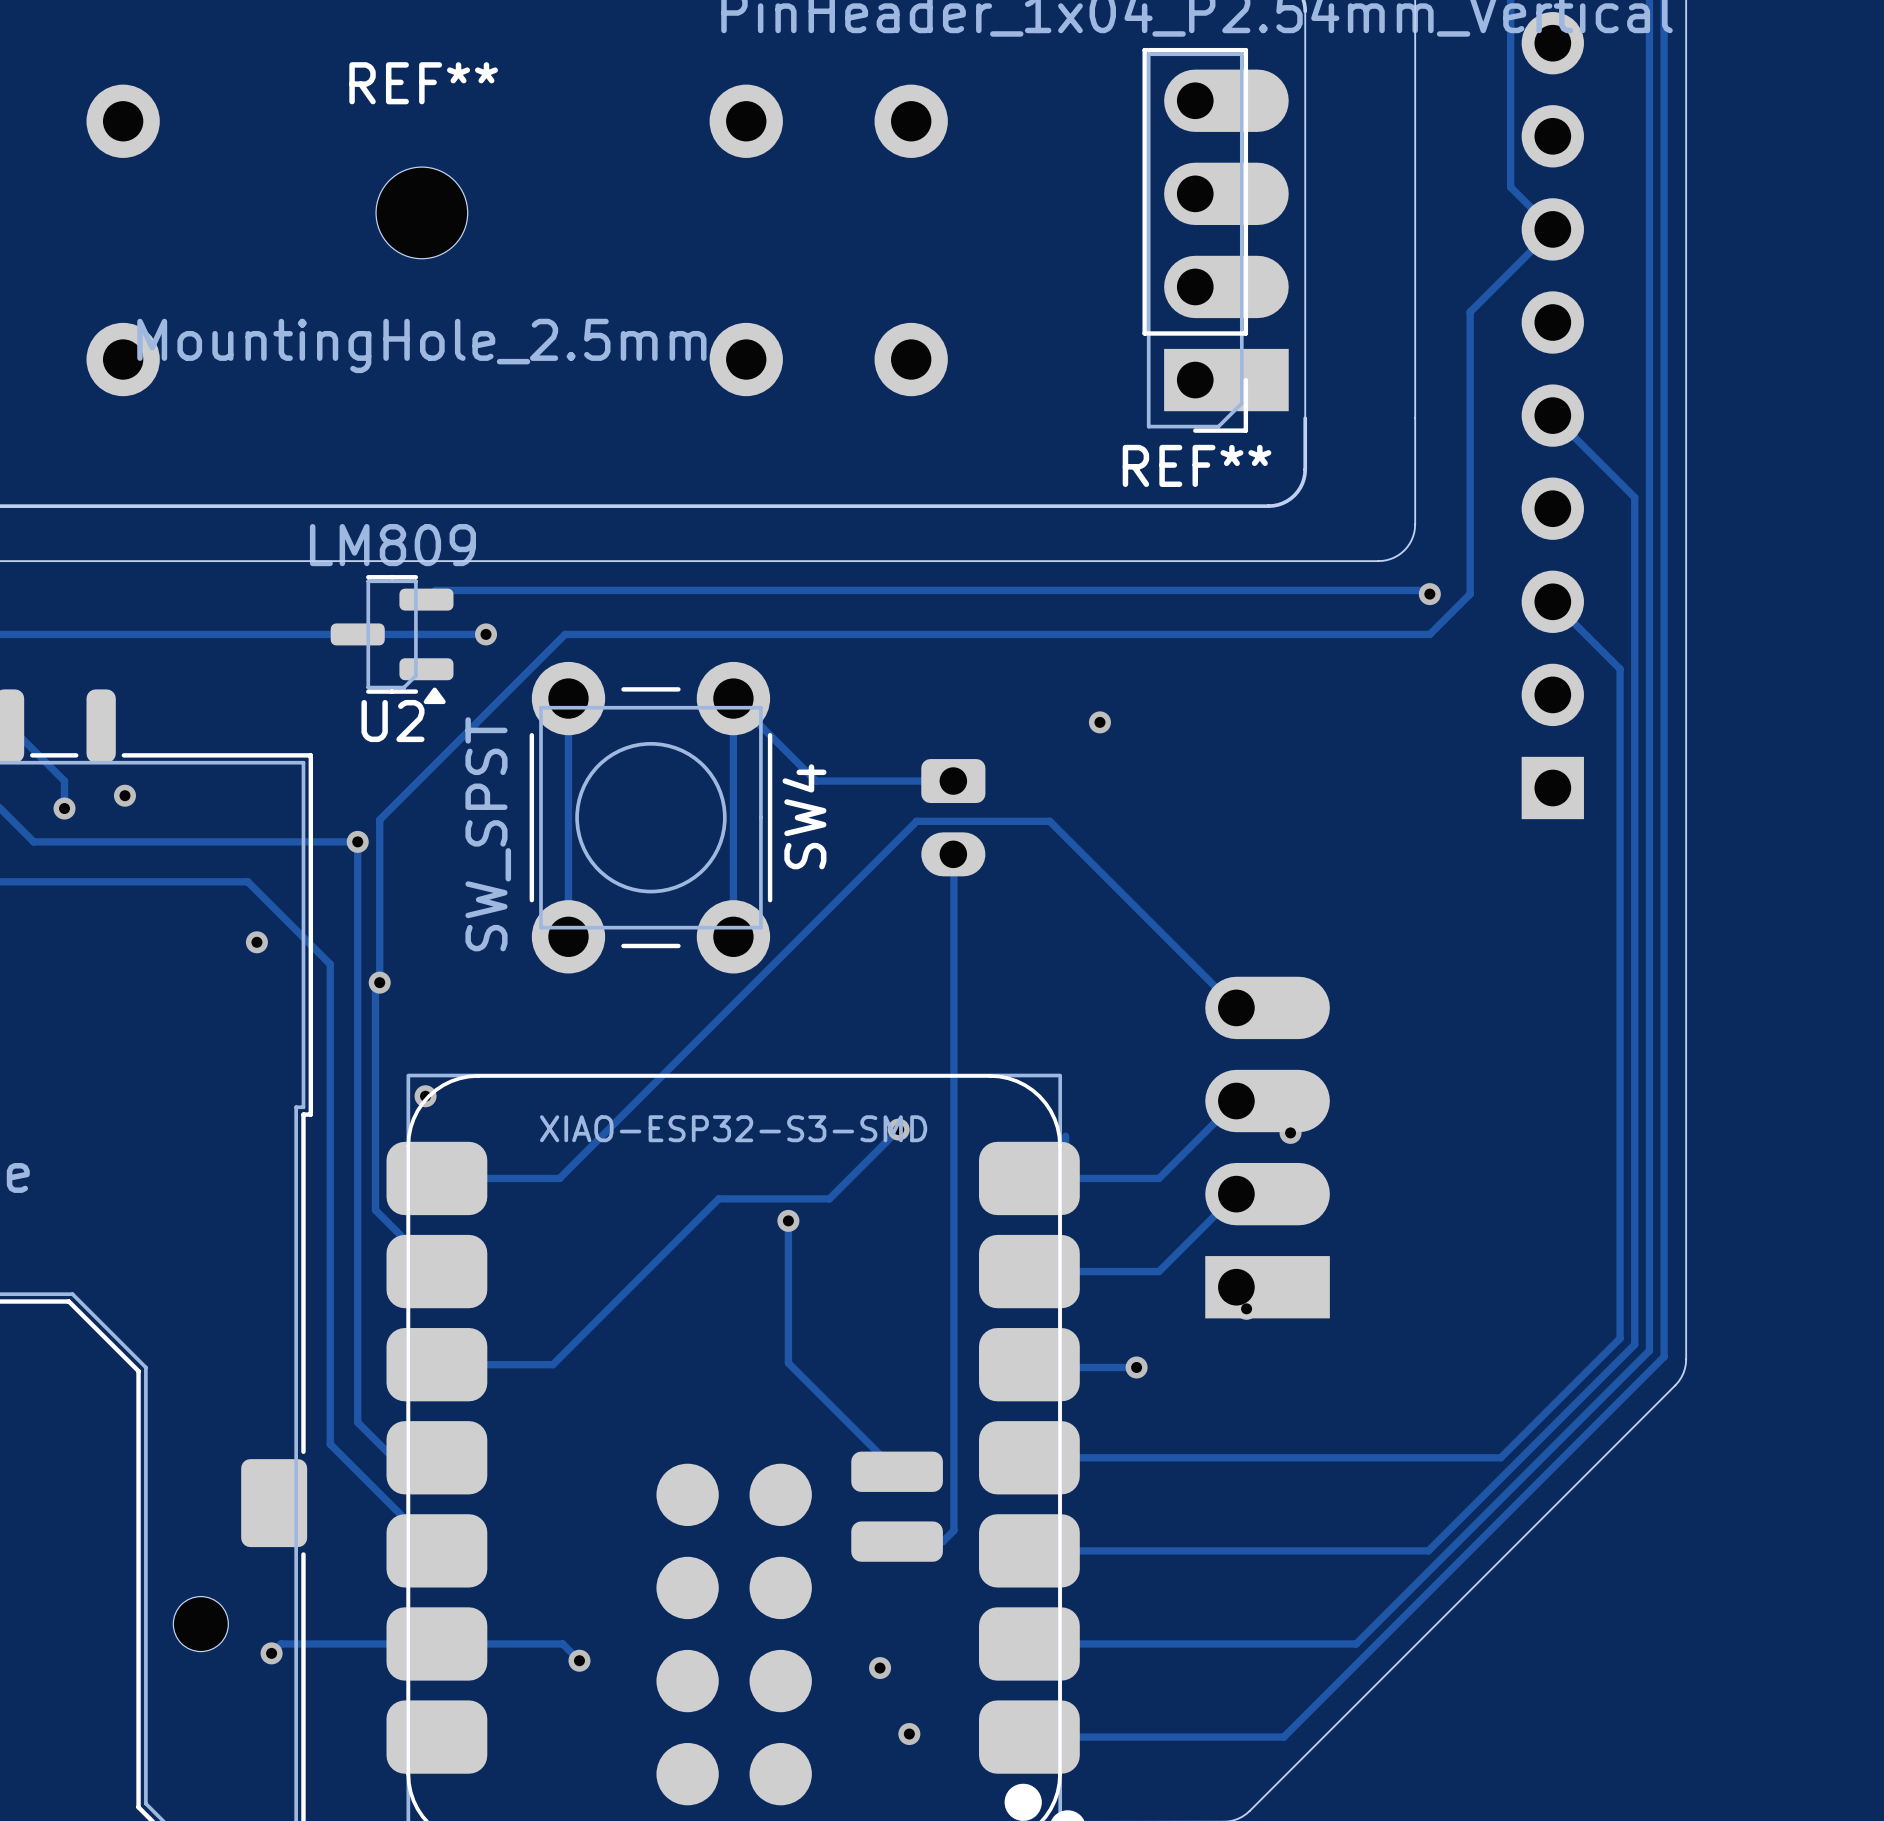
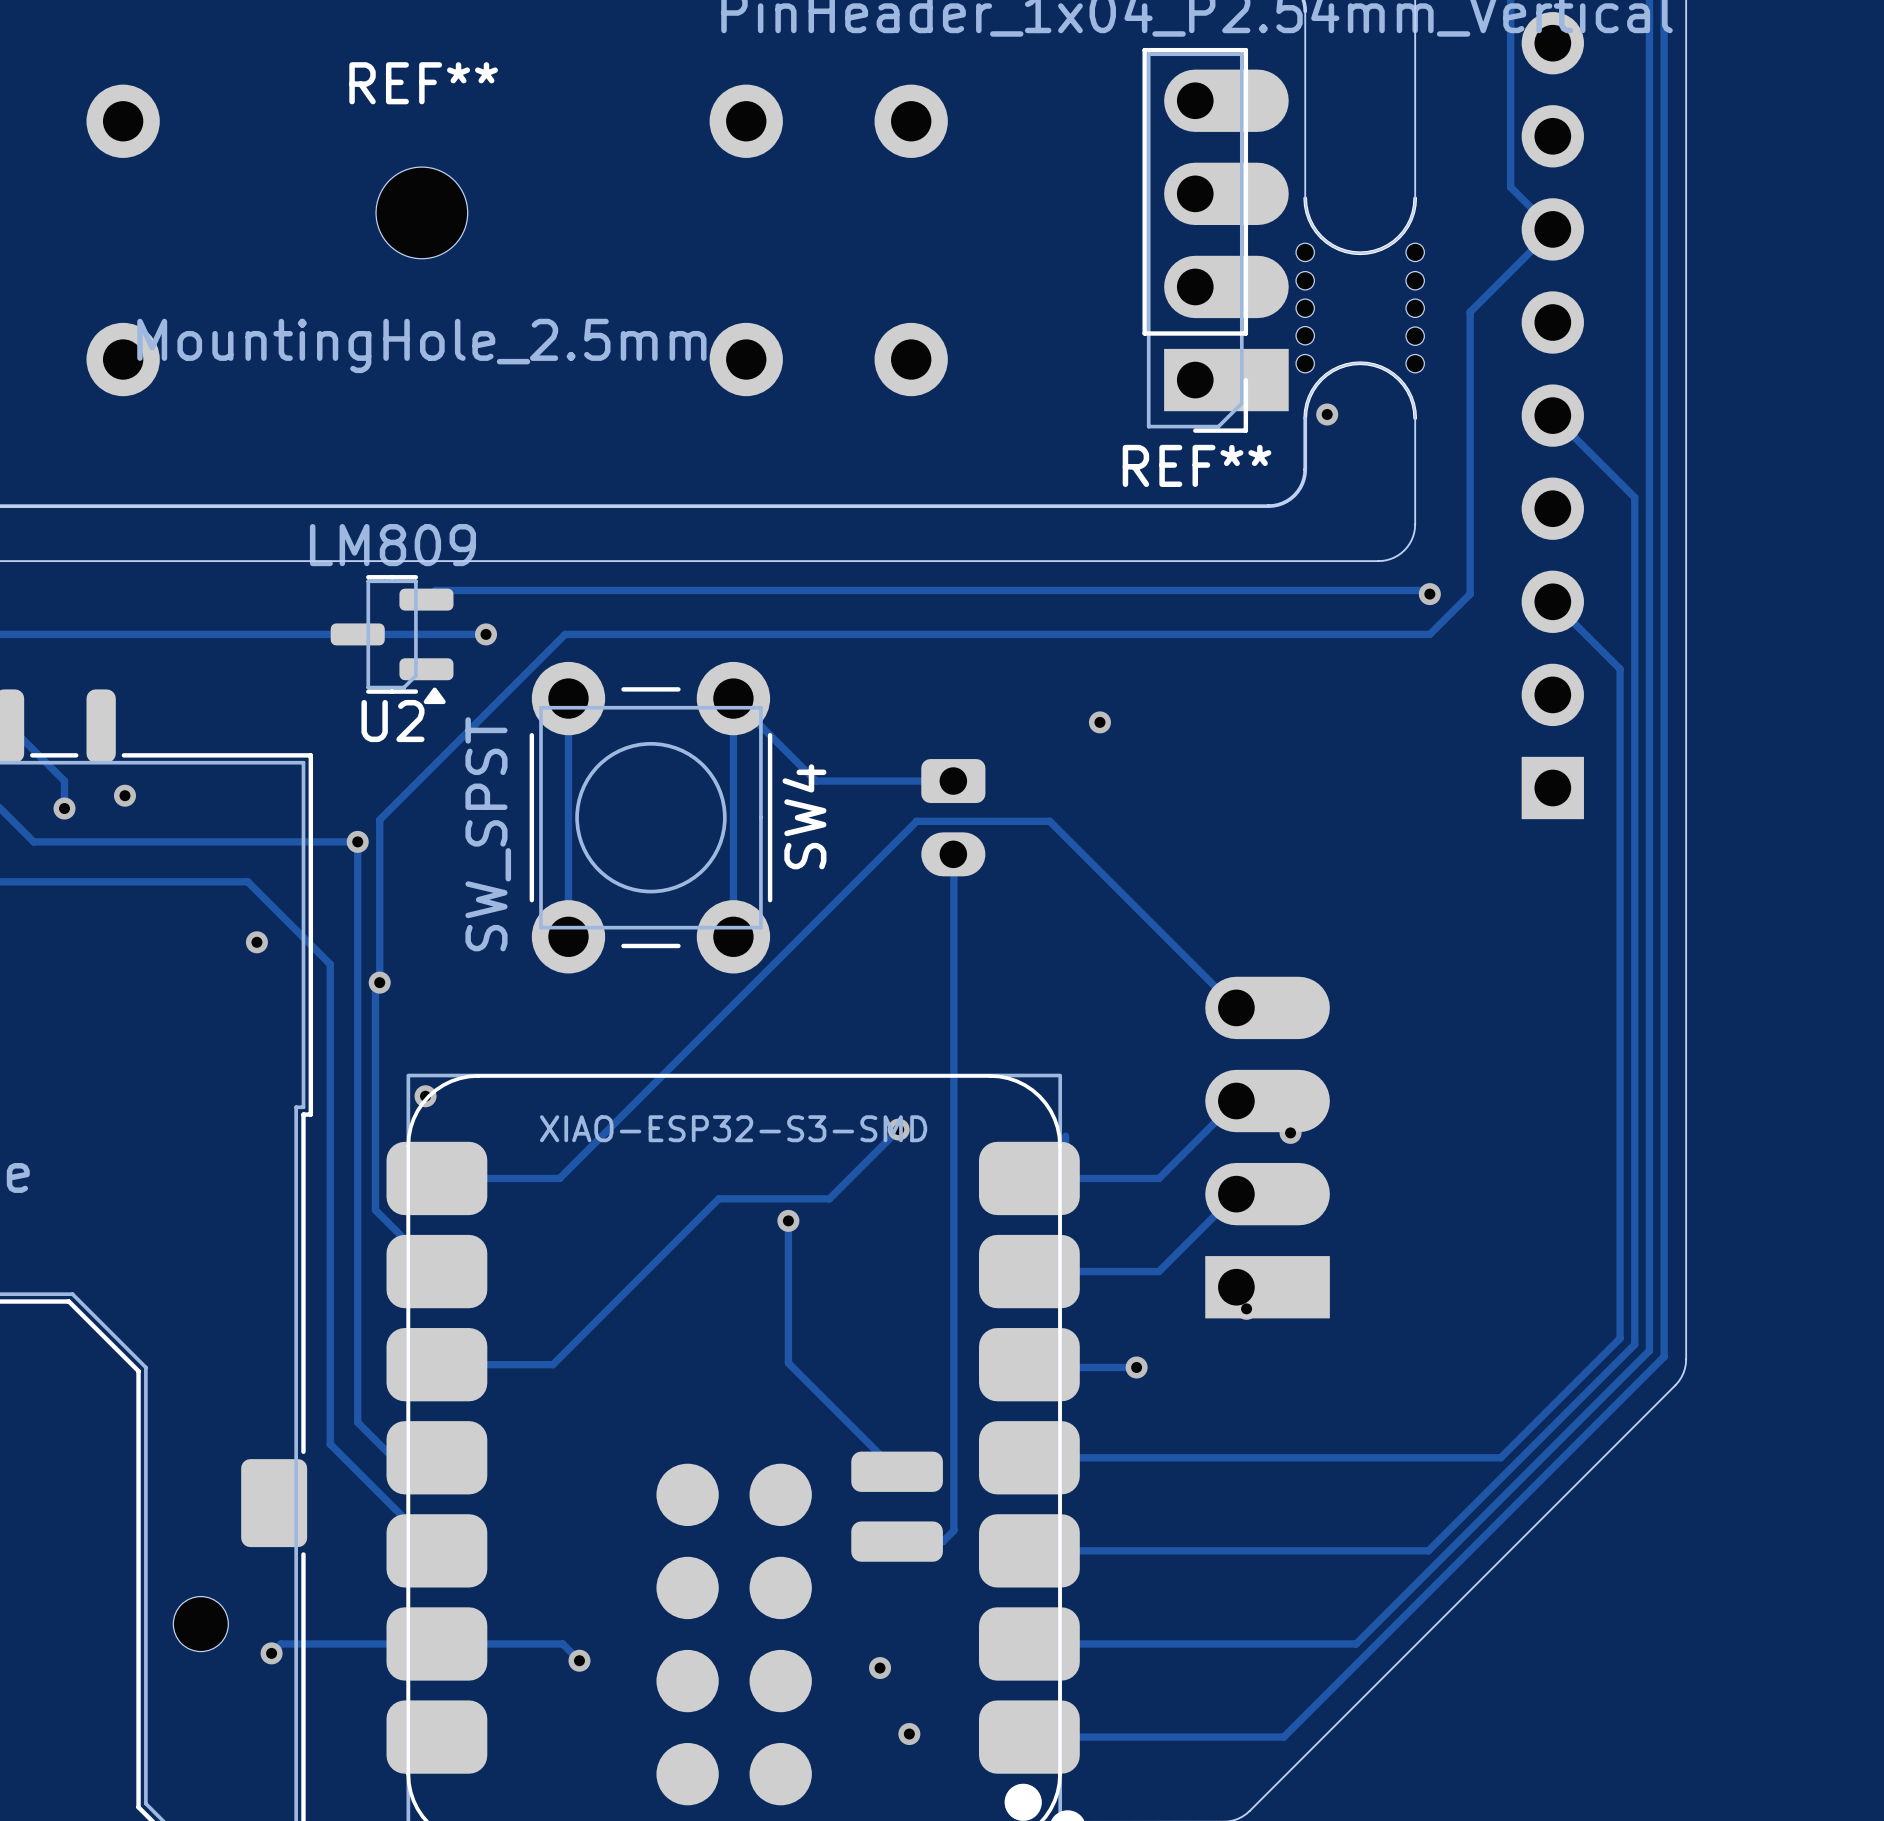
board edge: (1305, 198) (1305, 418) -> (1305, 198) (1308, 217) (1319, 234) (1334, 246) (1347, 251) (1360, 253) (1379, 249) (1396, 239) (1408, 223) (1413, 211) (1415, 198)
board edge: (1415, 198) (1415, 418) -> (1305, 418) (1306, 405) (1311, 392) (1323, 377) (1340, 366) (1360, 363) (1379, 366) (1396, 377) (1408, 392) (1413, 405) (1415, 418)
part: none -> (1360, 308)
via: none -> (1327, 414)

